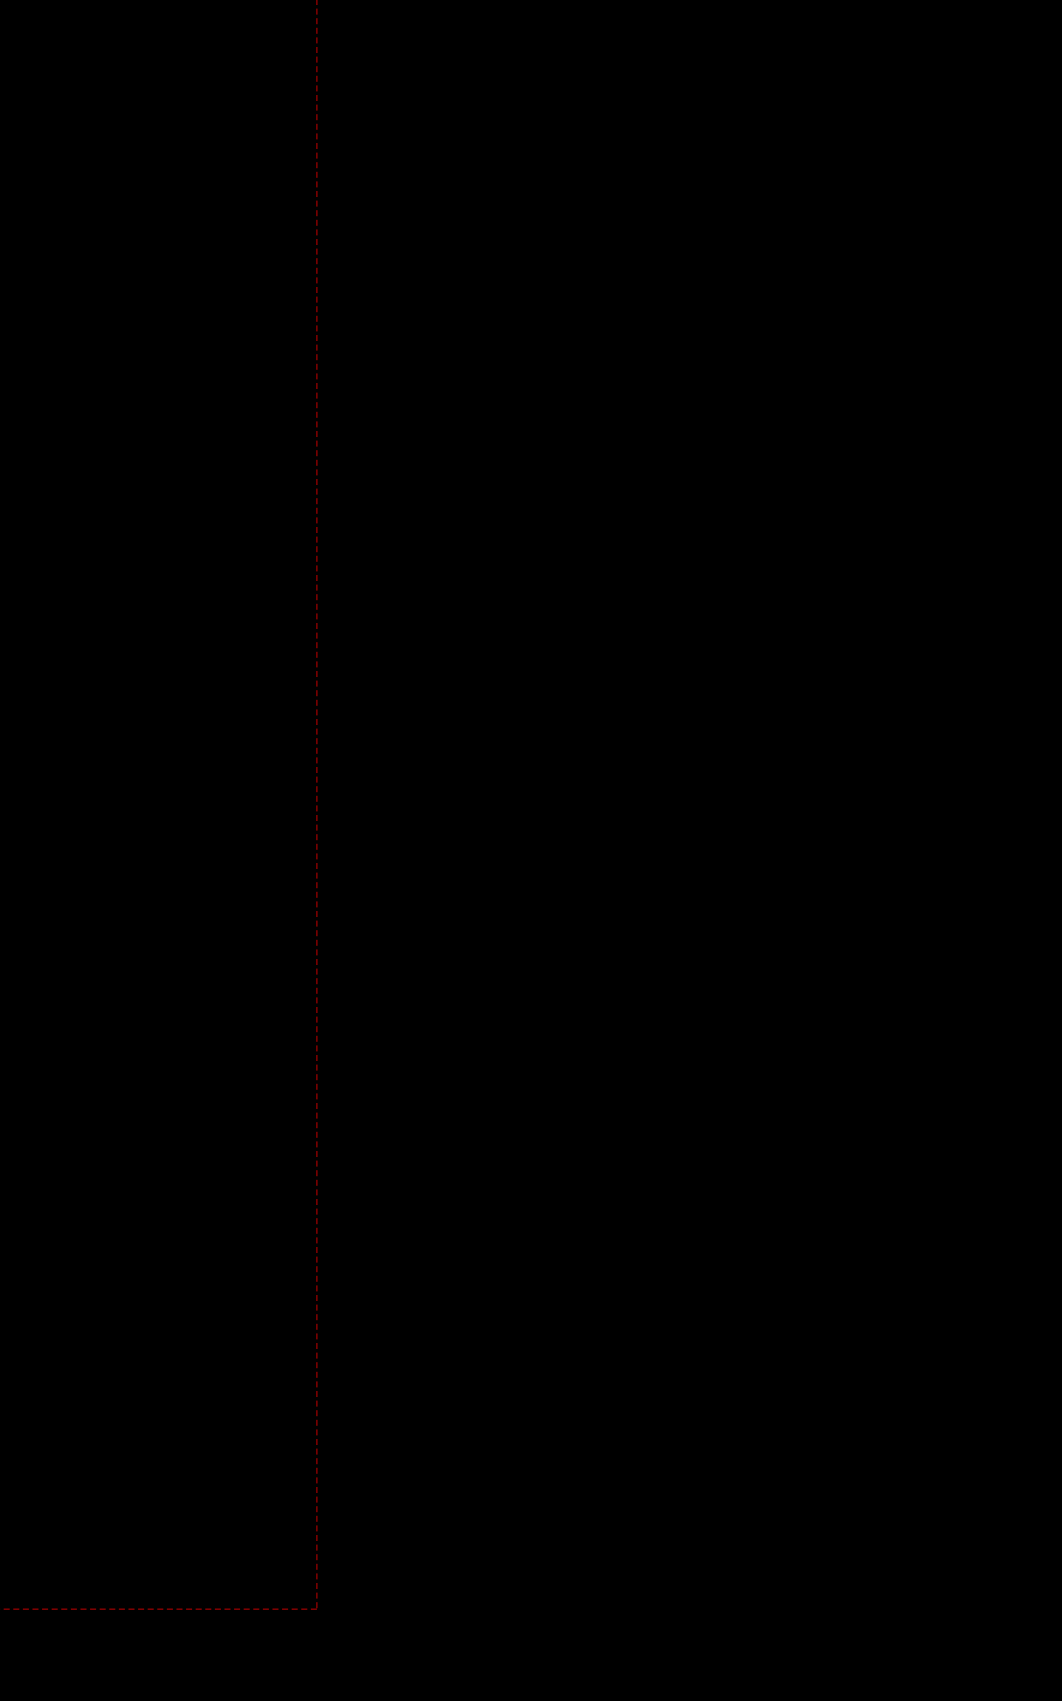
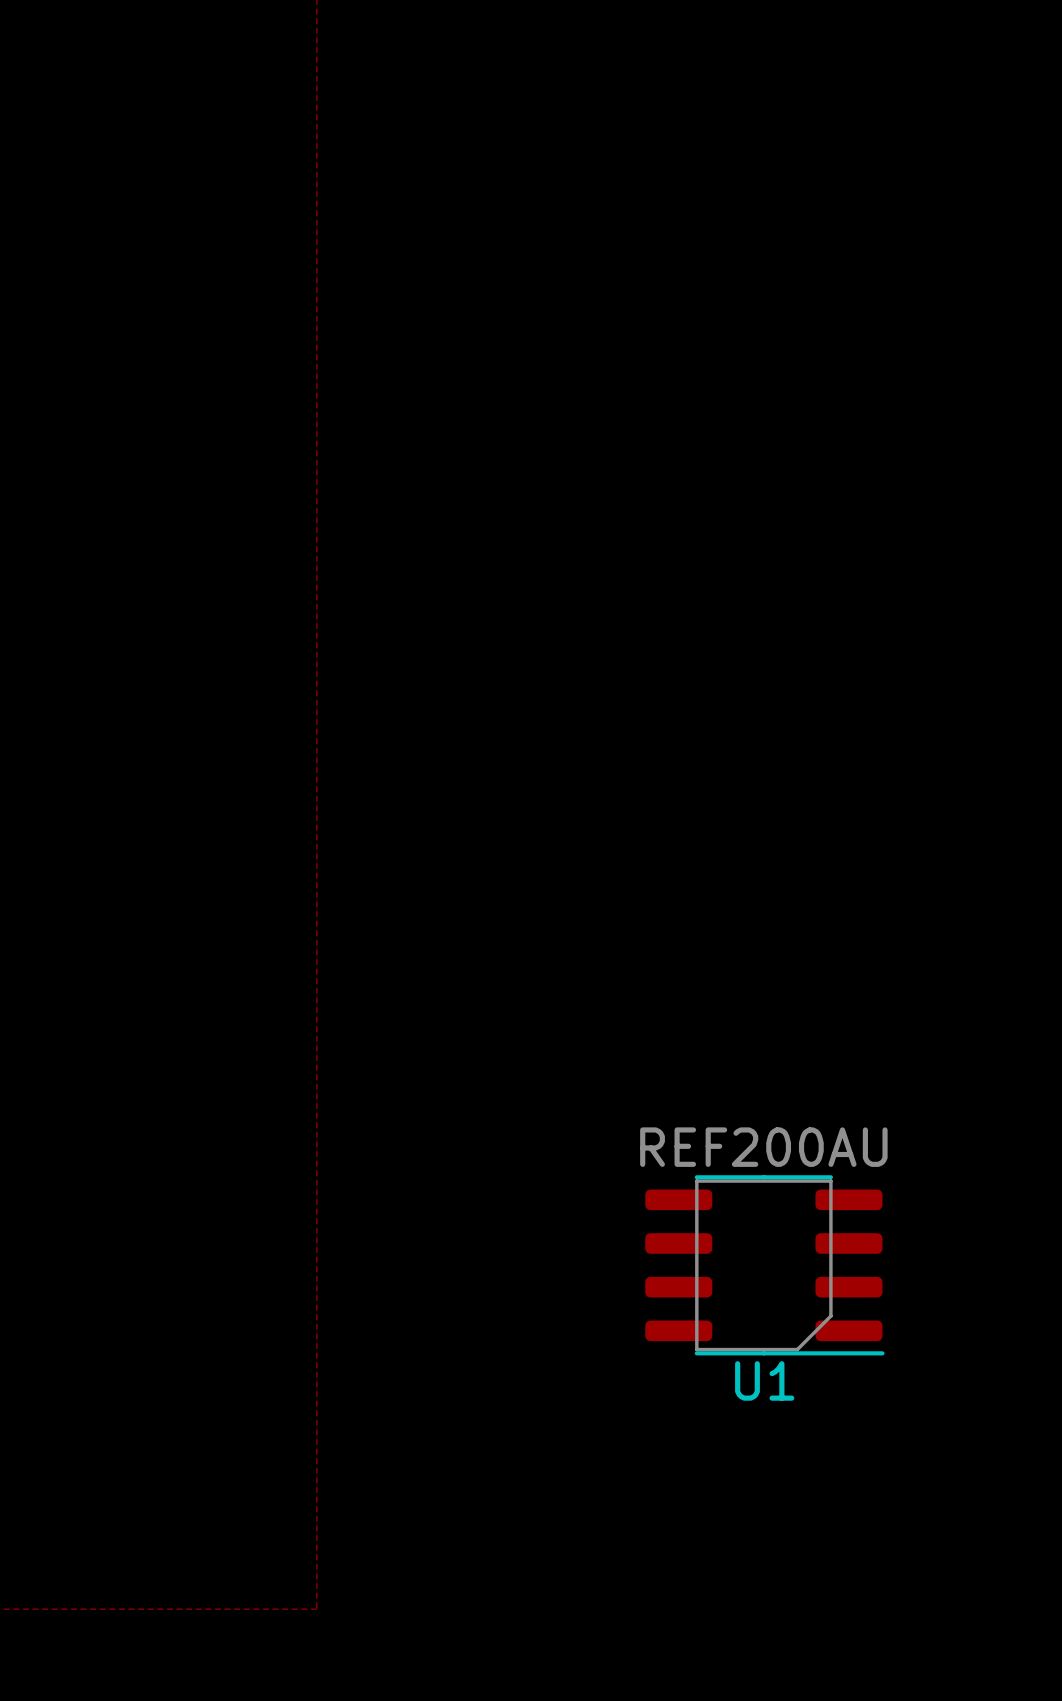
U1: none -> REF200AU (764, 1265)

